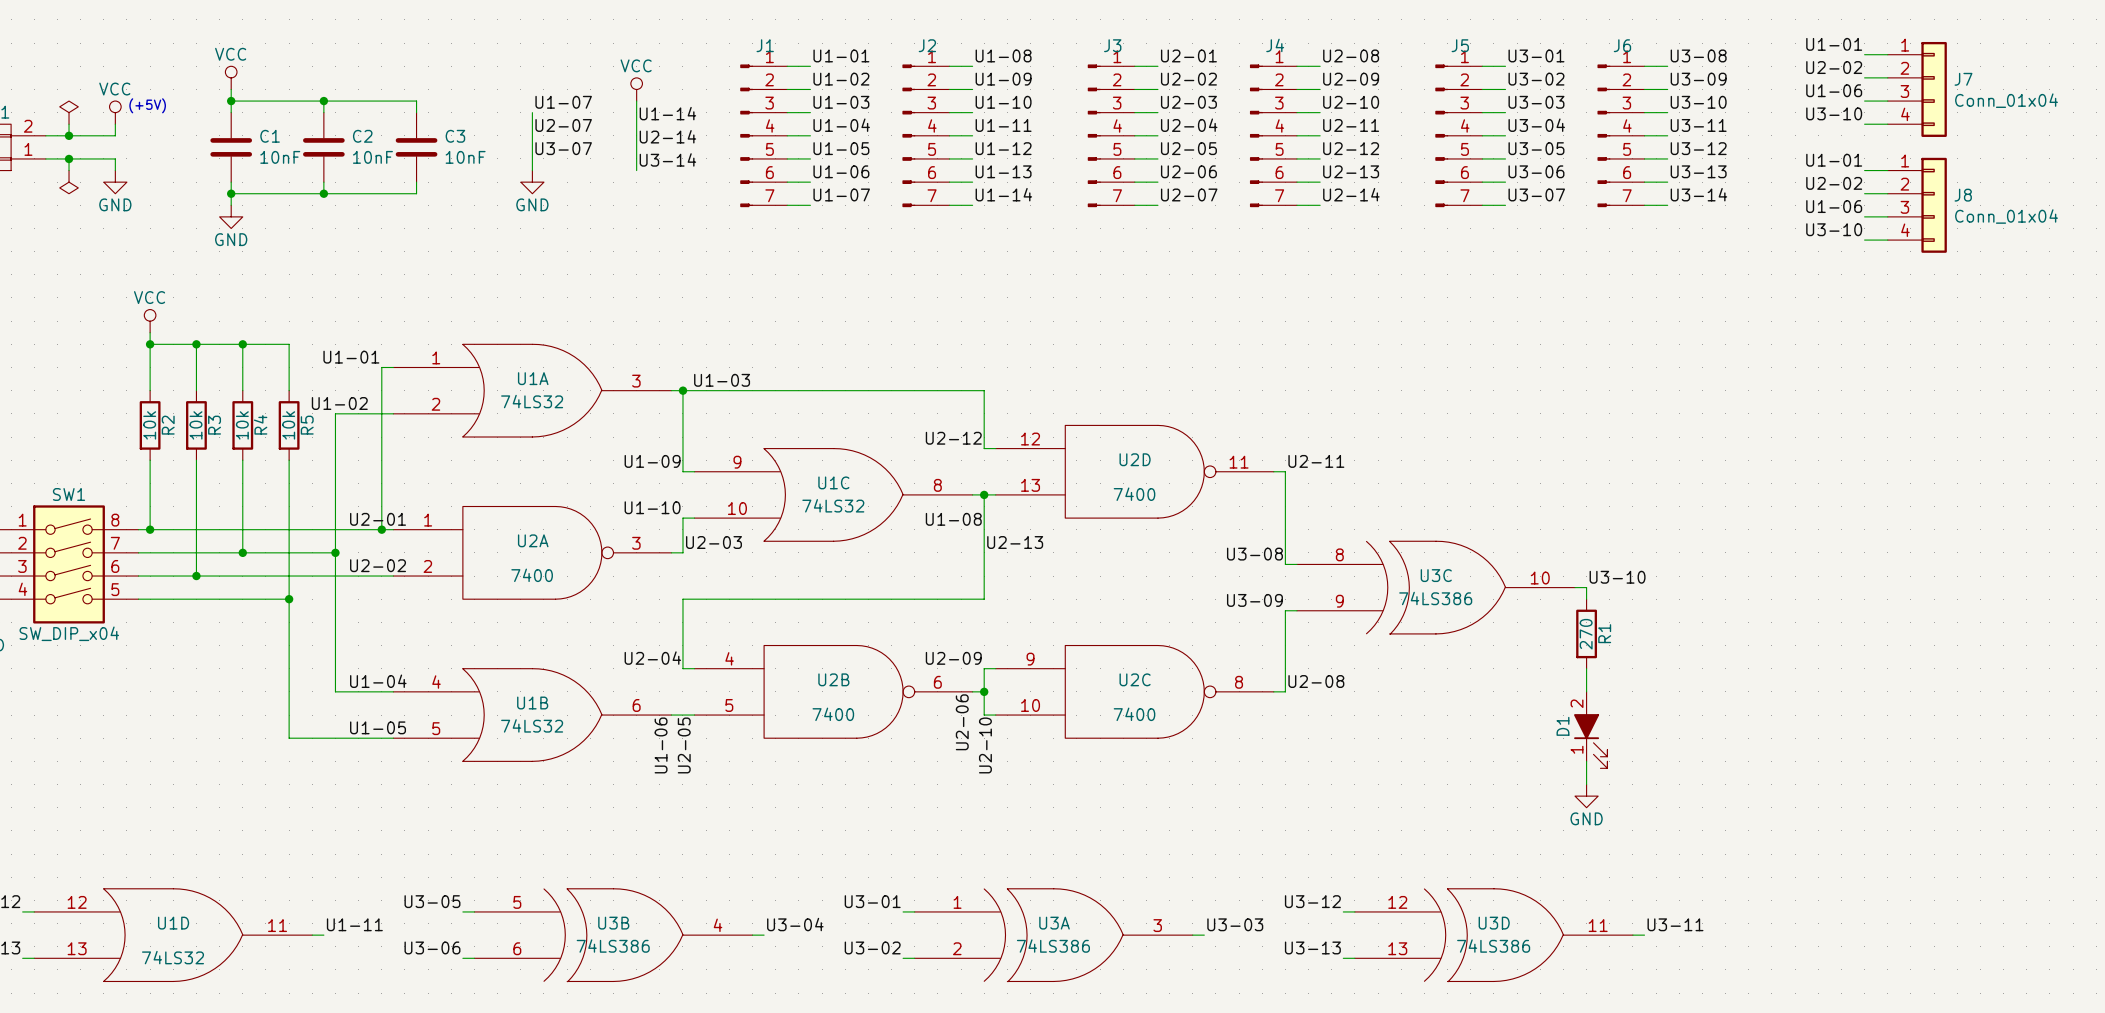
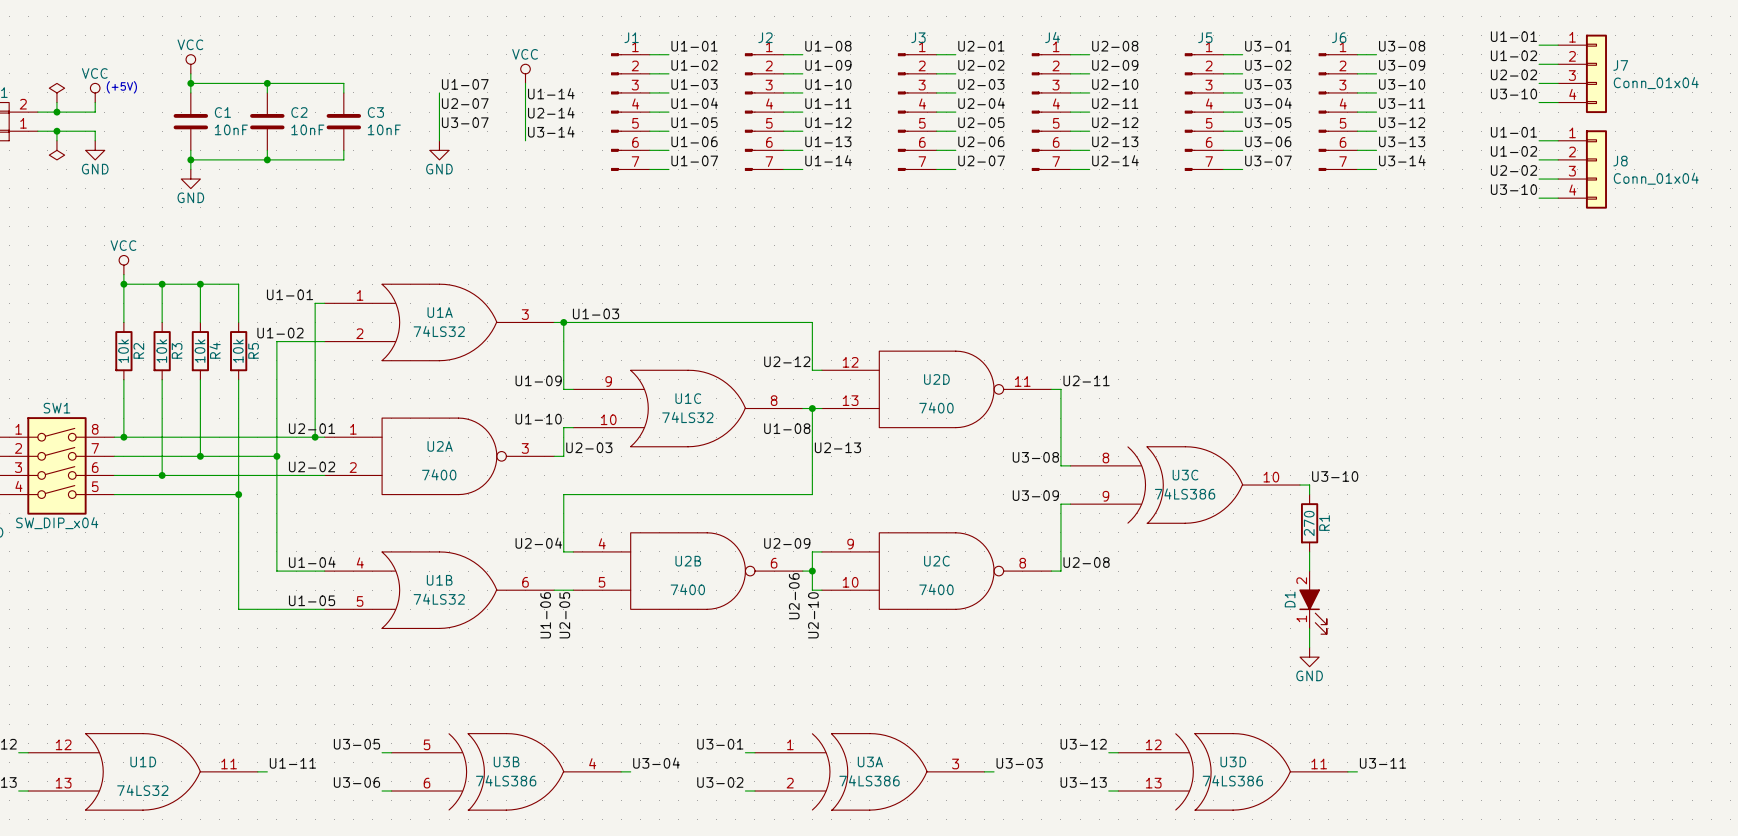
label: U2-02 (1834, 67) -> U1-02 (1513, 55)
label: U1-06 (1834, 90) -> U2-02 (1513, 74)
label: U2-02 (1834, 183) -> U1-02 (1513, 151)
label: U1-06 (1834, 206) -> U2-02 (1513, 170)

